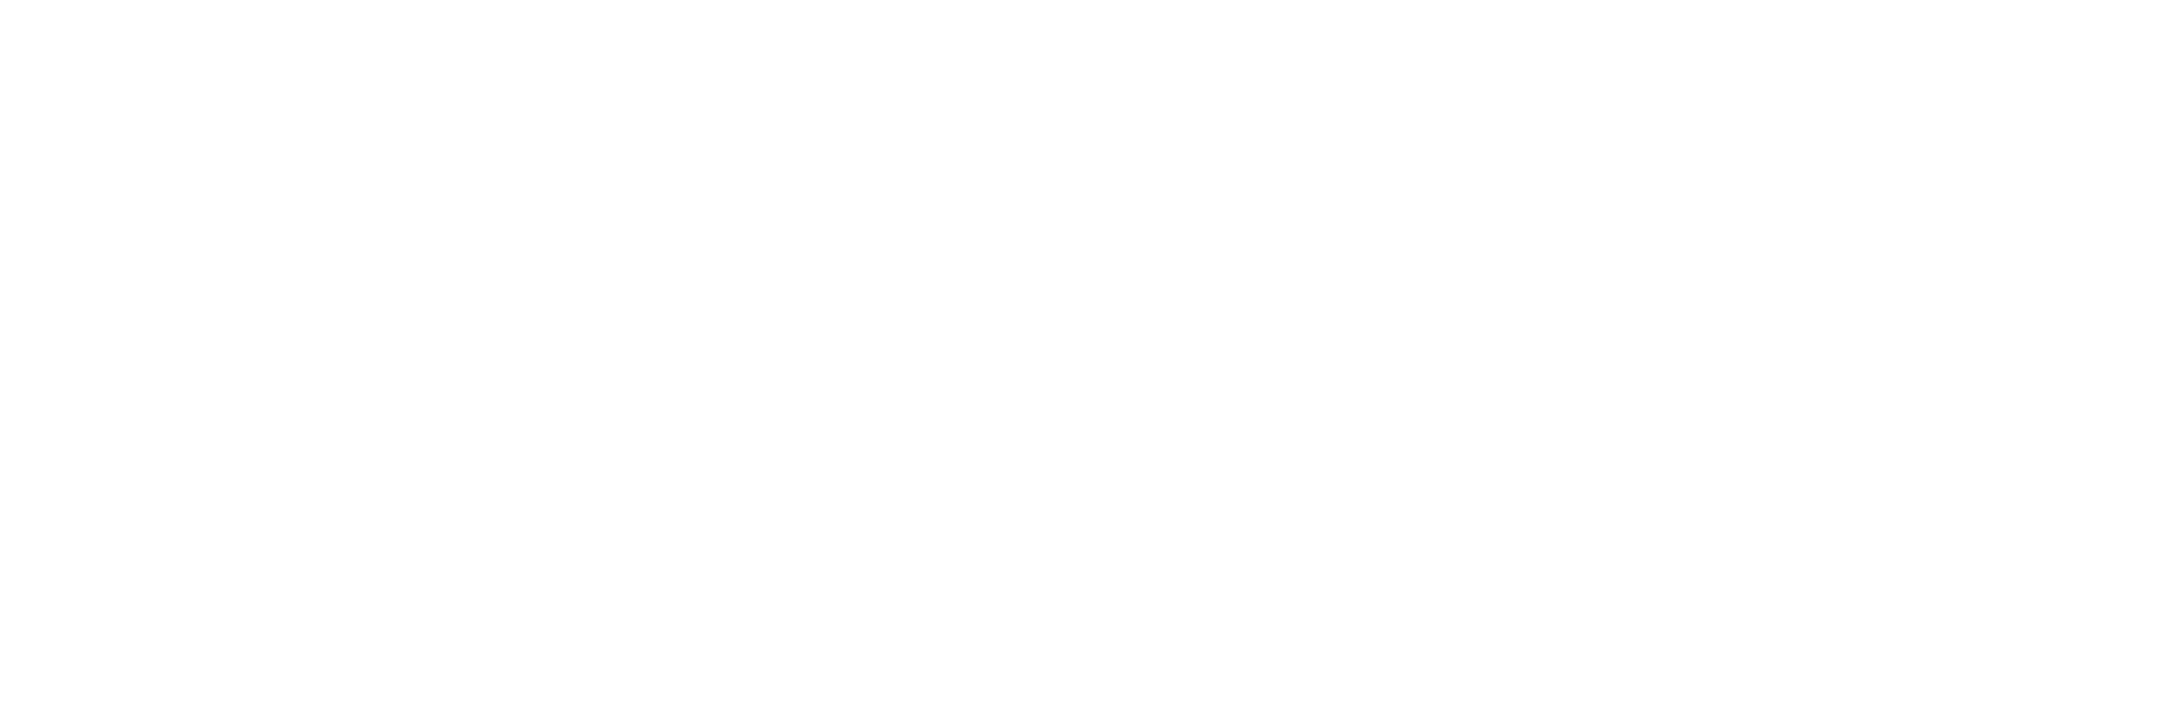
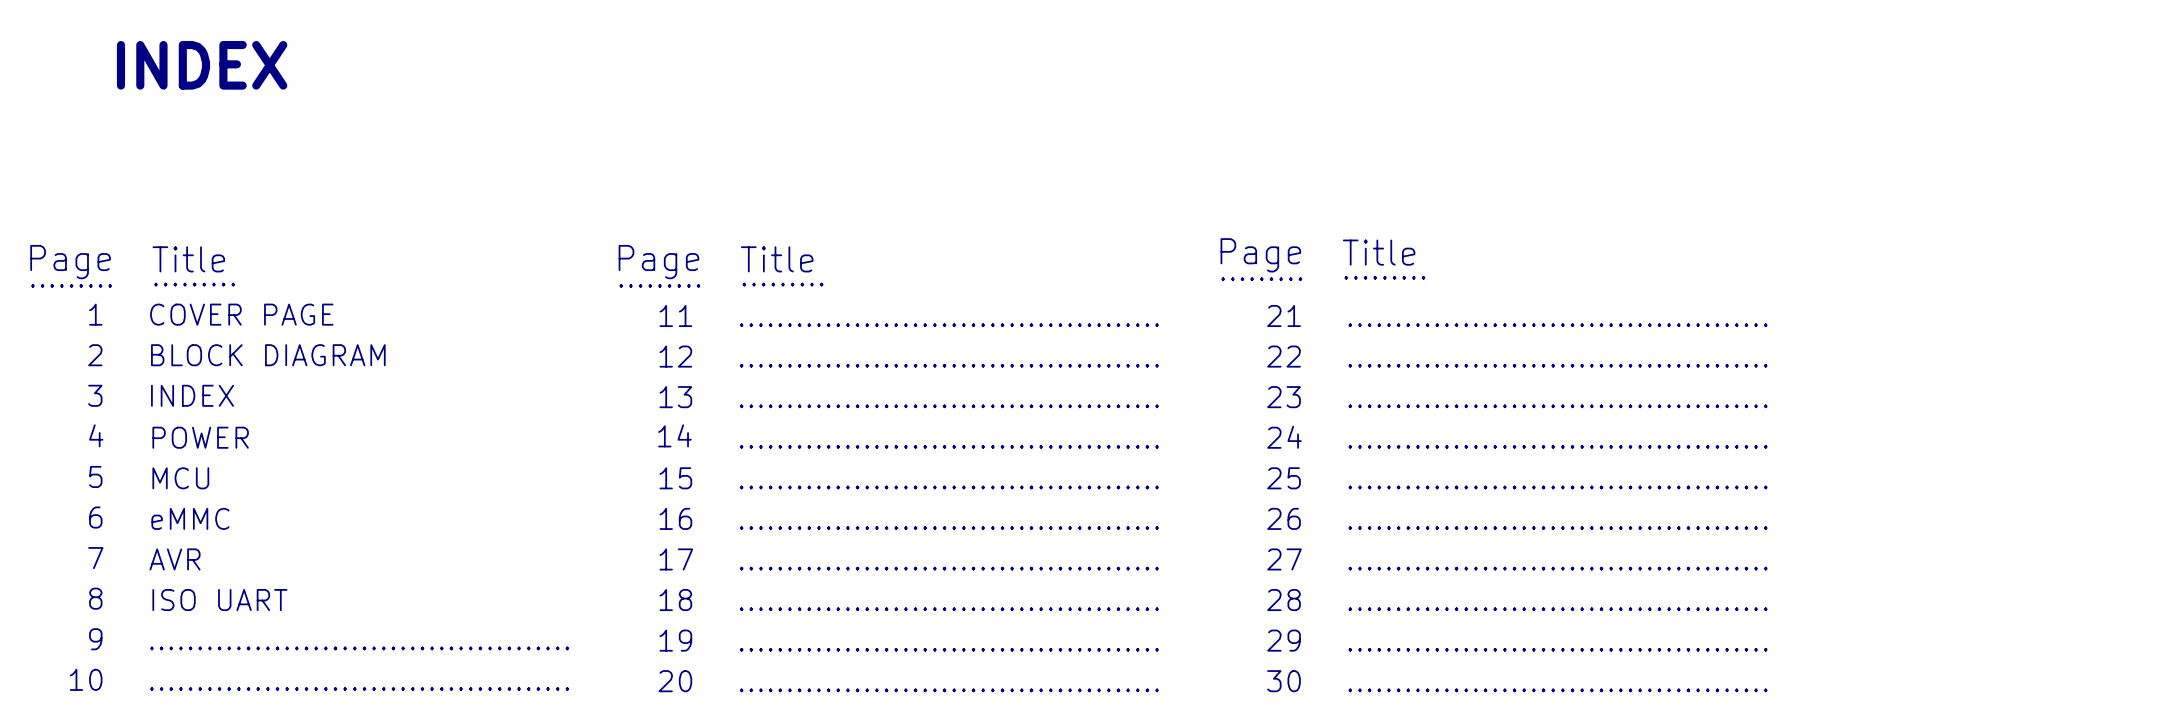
text: none -> INDEX (202, 65)
text: none -> Title (1379, 252)
text: none -> Page (1260, 255)
text: none -> Title (188, 259)
text: none -> Title (777, 259)
text: none -> Page (70, 262)
text: none -> Page (658, 262)
text: none -> ......... (1384, 277)
text: none -> ......... (1261, 279)
text: none -> ......... (194, 284)
text: none -> ......... (783, 284)
text: none -> ......... (71, 285)
text: none -> ......... (659, 285)
text: none -> 1 (95, 314)
text: none -> COVER PAGE (241, 314)
text: none -> 11 (675, 315)
text: none -> 21 (1284, 315)
text: none -> ............................................ (949, 325)
text: none -> ............................................ (1558, 325)
text: none -> 2 (95, 355)
text: none -> BLOCK DIAGRAM (268, 355)
text: none -> 12 (675, 356)
text: none -> 22 (1284, 356)
text: none -> ............................................ (949, 365)
text: none -> ............................................ (1558, 365)
text: none -> 3 (95, 395)
text: none -> INDEX (192, 395)
text: none -> 13 (675, 397)
text: none -> 23 (1284, 397)
text: none -> ............................................ (949, 406)
text: none -> ............................................ (1558, 406)
text: none -> 4 (96, 435)
text: none -> 14 (674, 435)
text: none -> POWER (200, 437)
text: none -> 24 (1284, 437)
text: none -> ............................................ (949, 446)
text: none -> ............................................ (1558, 446)
text: none -> 5 (95, 476)
text: none -> MCU (180, 478)
text: none -> 15 (675, 478)
text: none -> 25 (1284, 478)
text: none -> ............................................ (949, 487)
text: none -> ............................................ (1558, 487)
text: none -> 6 (95, 517)
text: none -> eMMC (190, 518)
text: none -> 16 (675, 518)
text: none -> 26 (1284, 518)
text: none -> ............................................ (949, 528)
text: none -> ............................................ (1558, 528)
text: none -> 7 (95, 558)
text: none -> AVR (175, 559)
text: none -> 17 (676, 559)
text: none -> 27 (1284, 559)
text: none -> ............................................ (949, 568)
text: none -> ............................................ (1558, 568)
text: none -> 8 (95, 598)
text: none -> ISO UART (219, 600)
text: none -> 18 (675, 600)
text: none -> 28 (1284, 600)
text: none -> ............................................ (949, 609)
text: none -> ............................................ (1558, 609)
text: none -> 9 (95, 639)
text: none -> 19 (675, 640)
text: none -> 29 (1284, 640)
text: none -> ............................................ (359, 648)
text: none -> ............................................ (949, 649)
text: none -> ............................................ (1558, 649)
text: none -> 10 (86, 679)
text: none -> 20 (675, 681)
text: none -> 30 (1284, 681)
text: none -> ............................................ (359, 689)
text: none -> ............................................ (949, 690)
text: none -> ............................................ (1558, 690)

